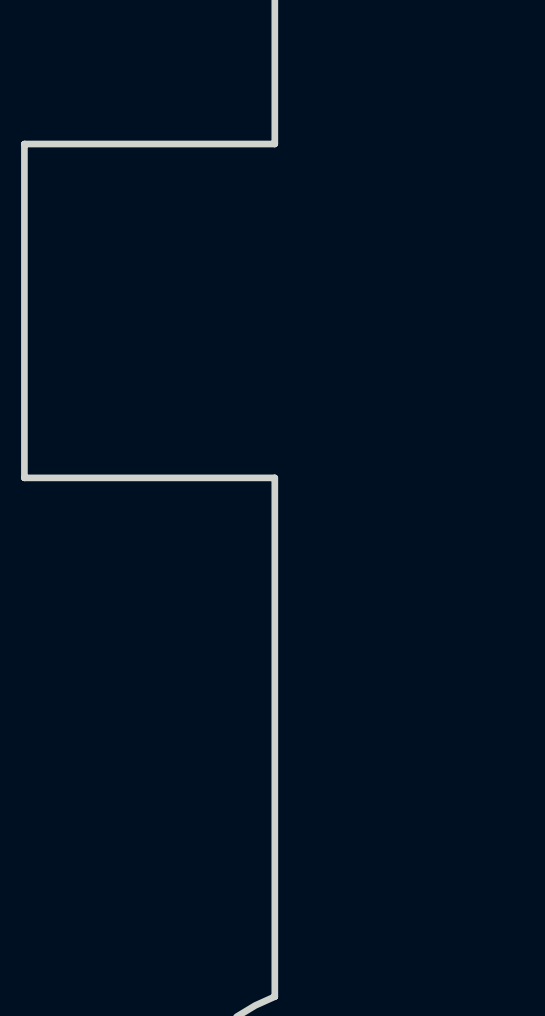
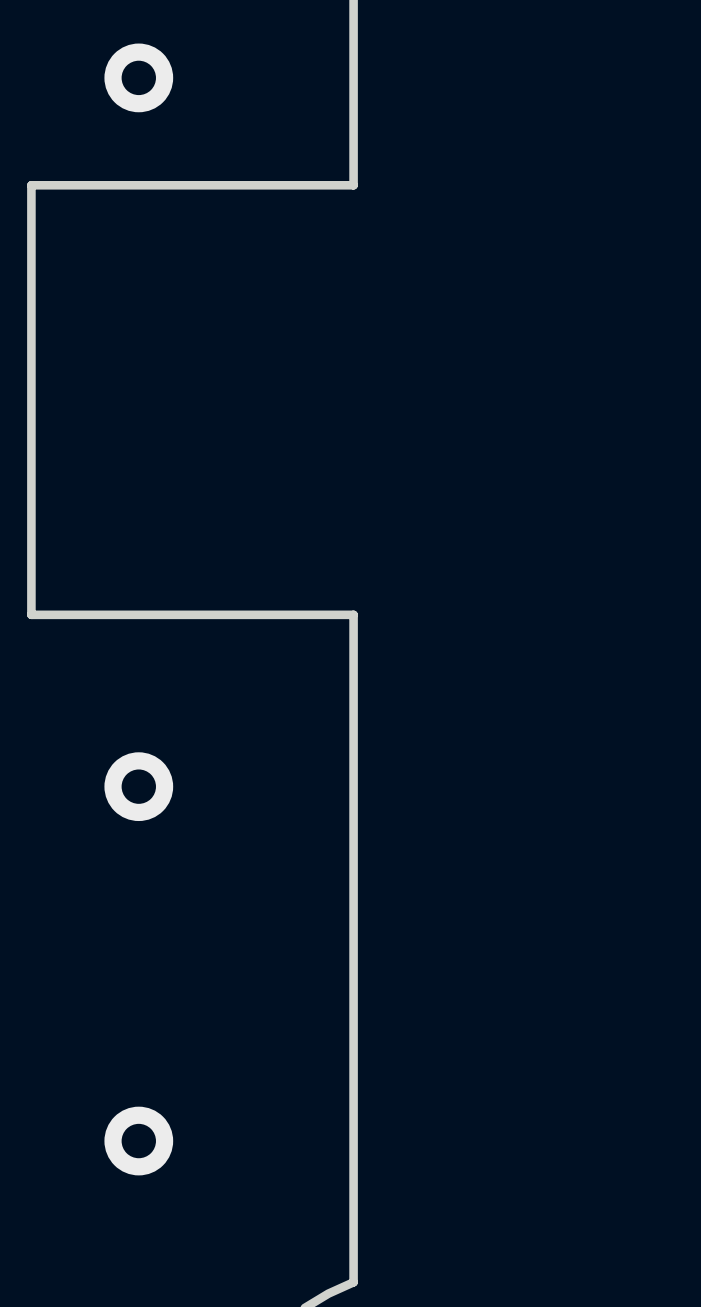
via: none -> (138, 77)
via: none -> (138, 786)
via: none -> (138, 1141)

